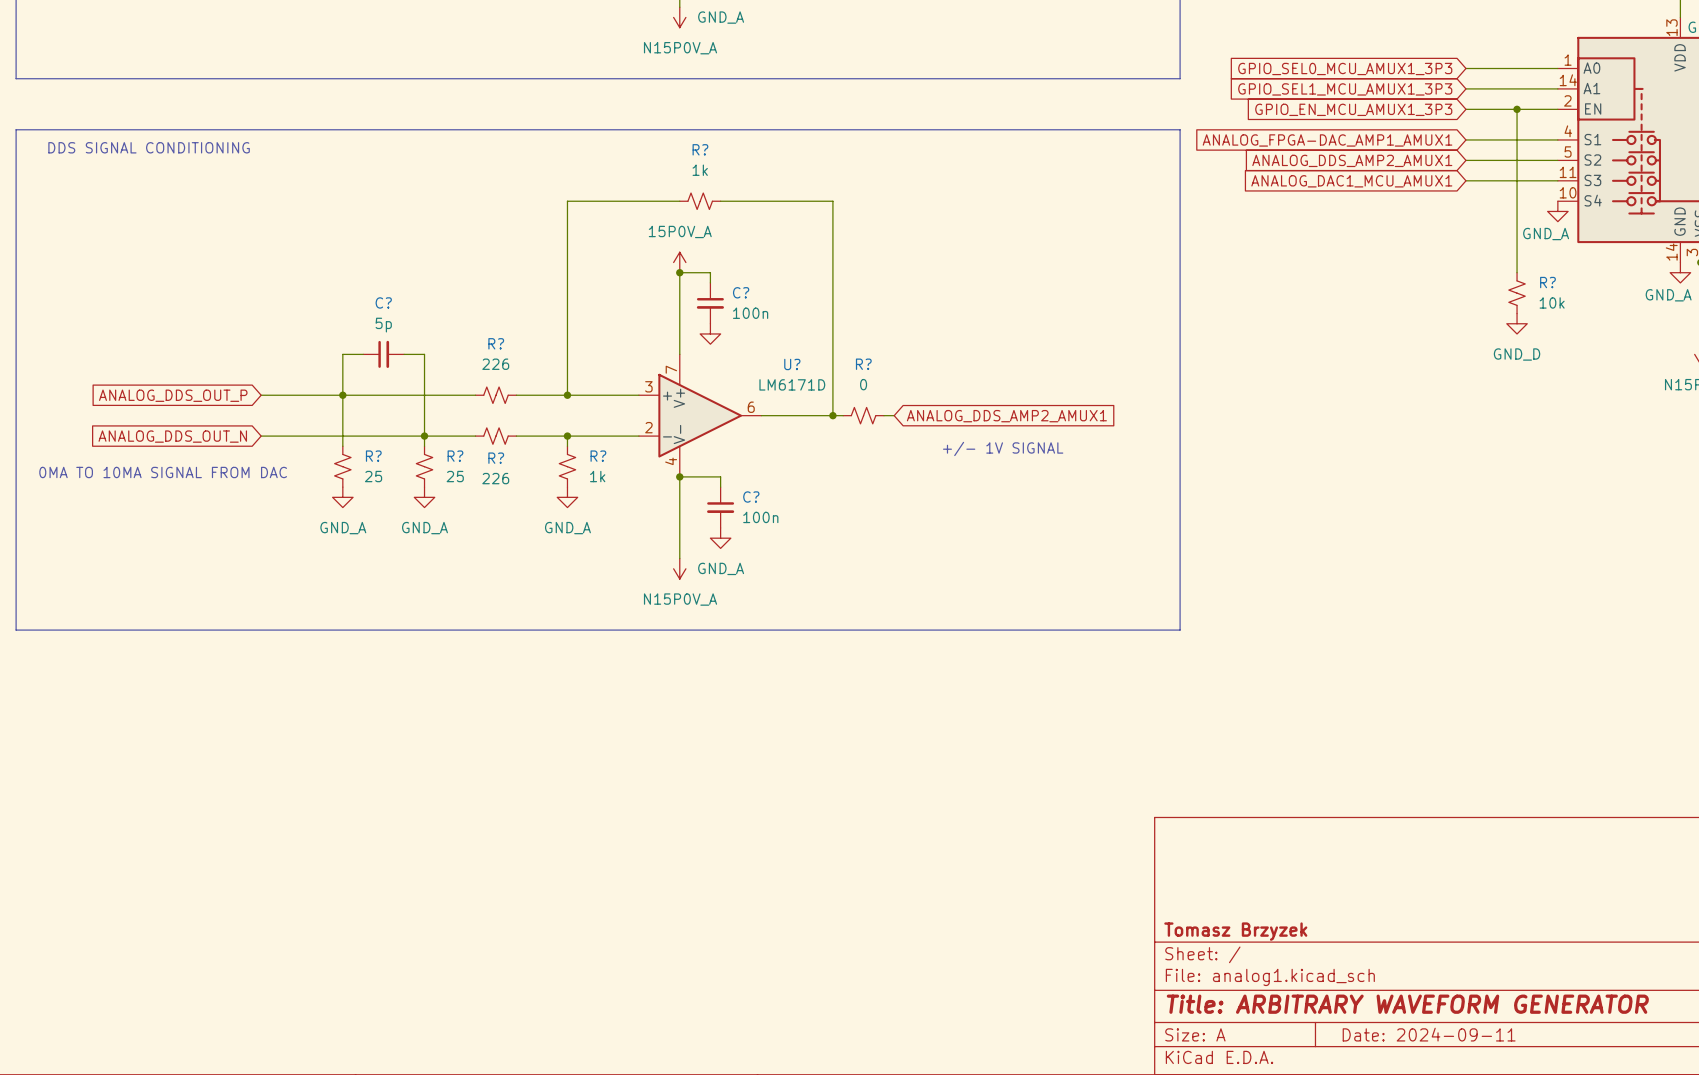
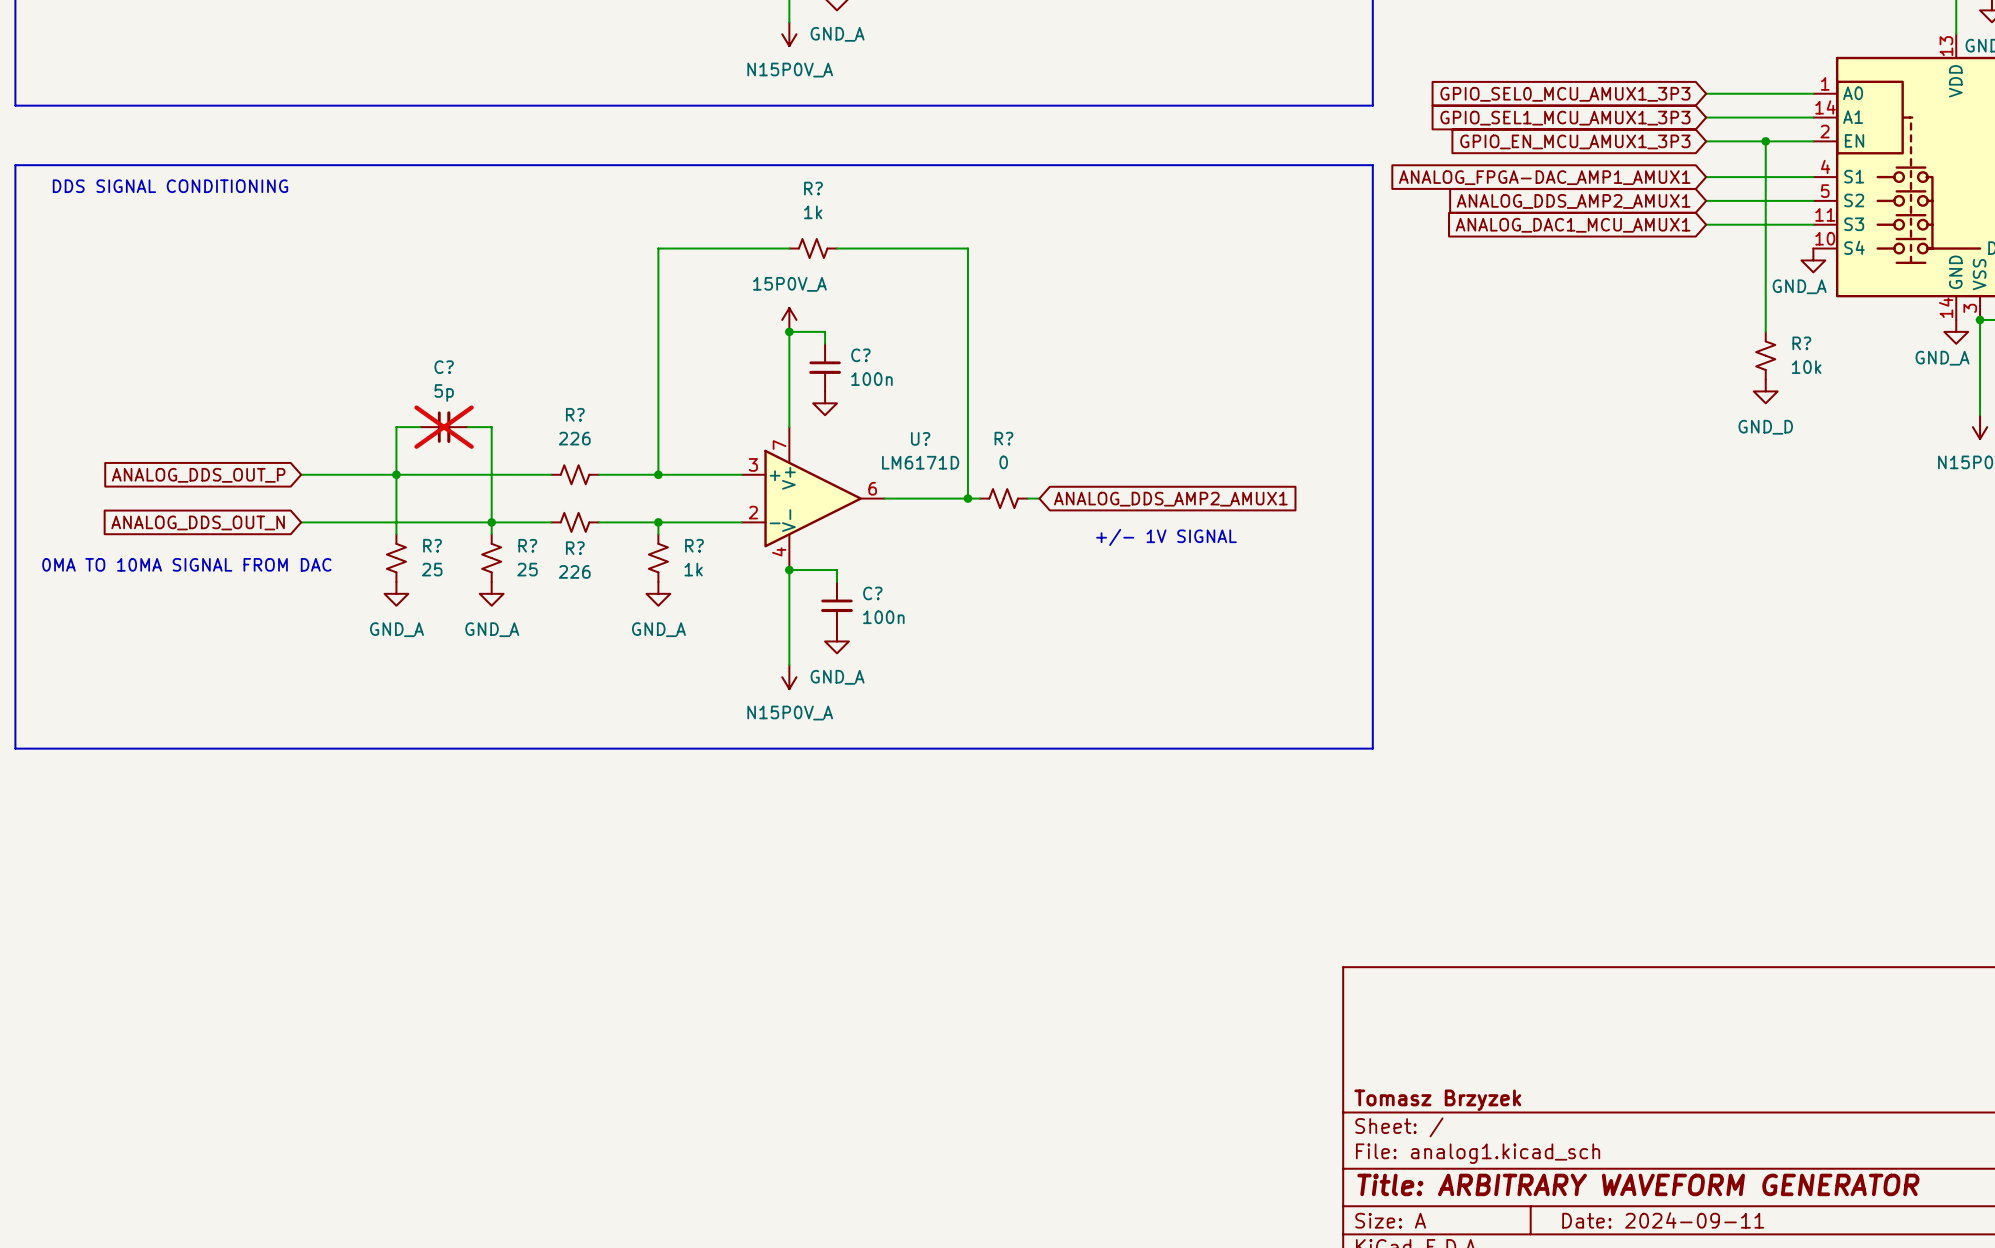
C? do-not-place cross: none -> (444, 427)

